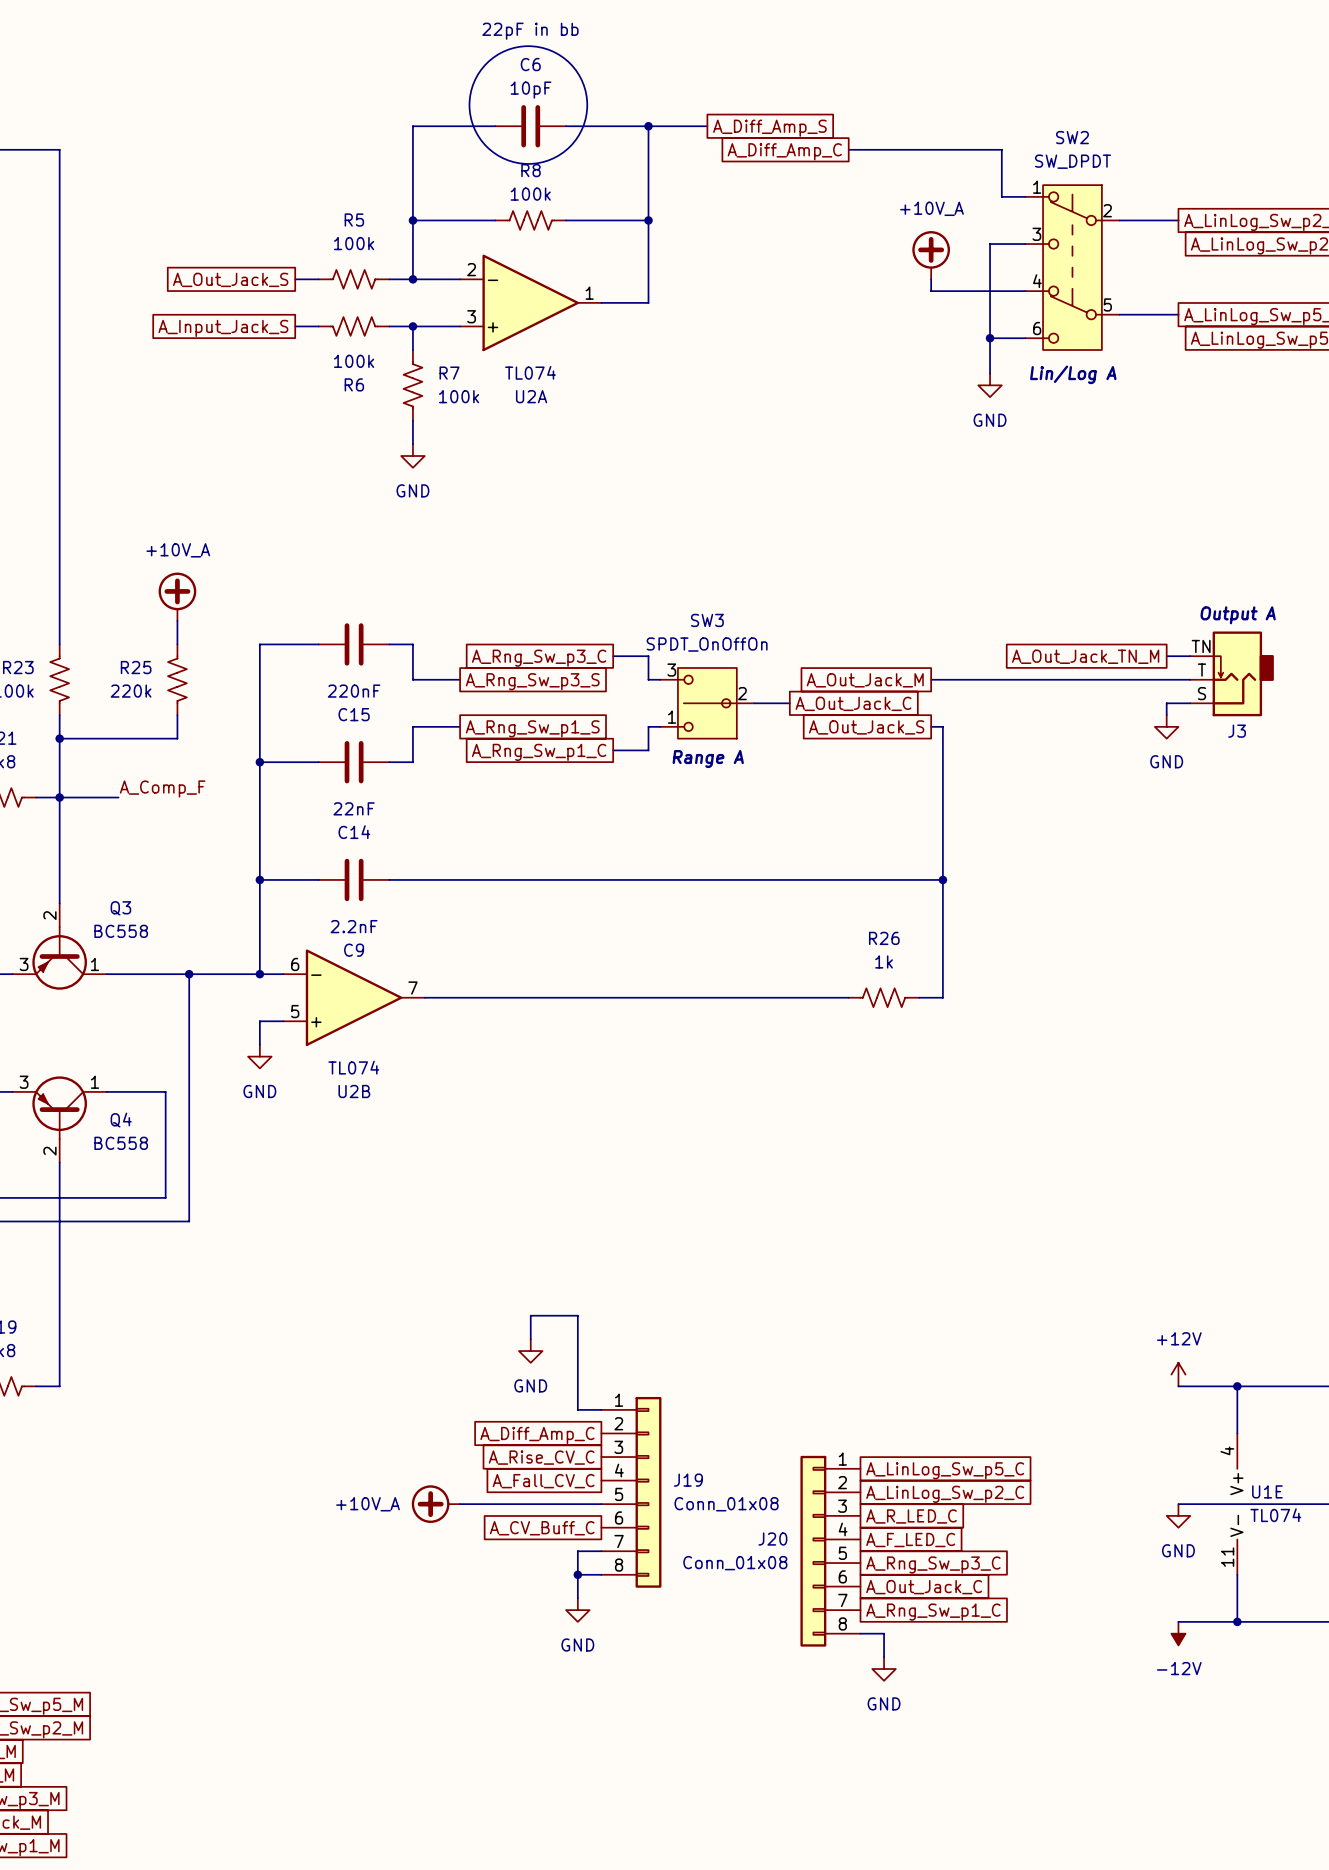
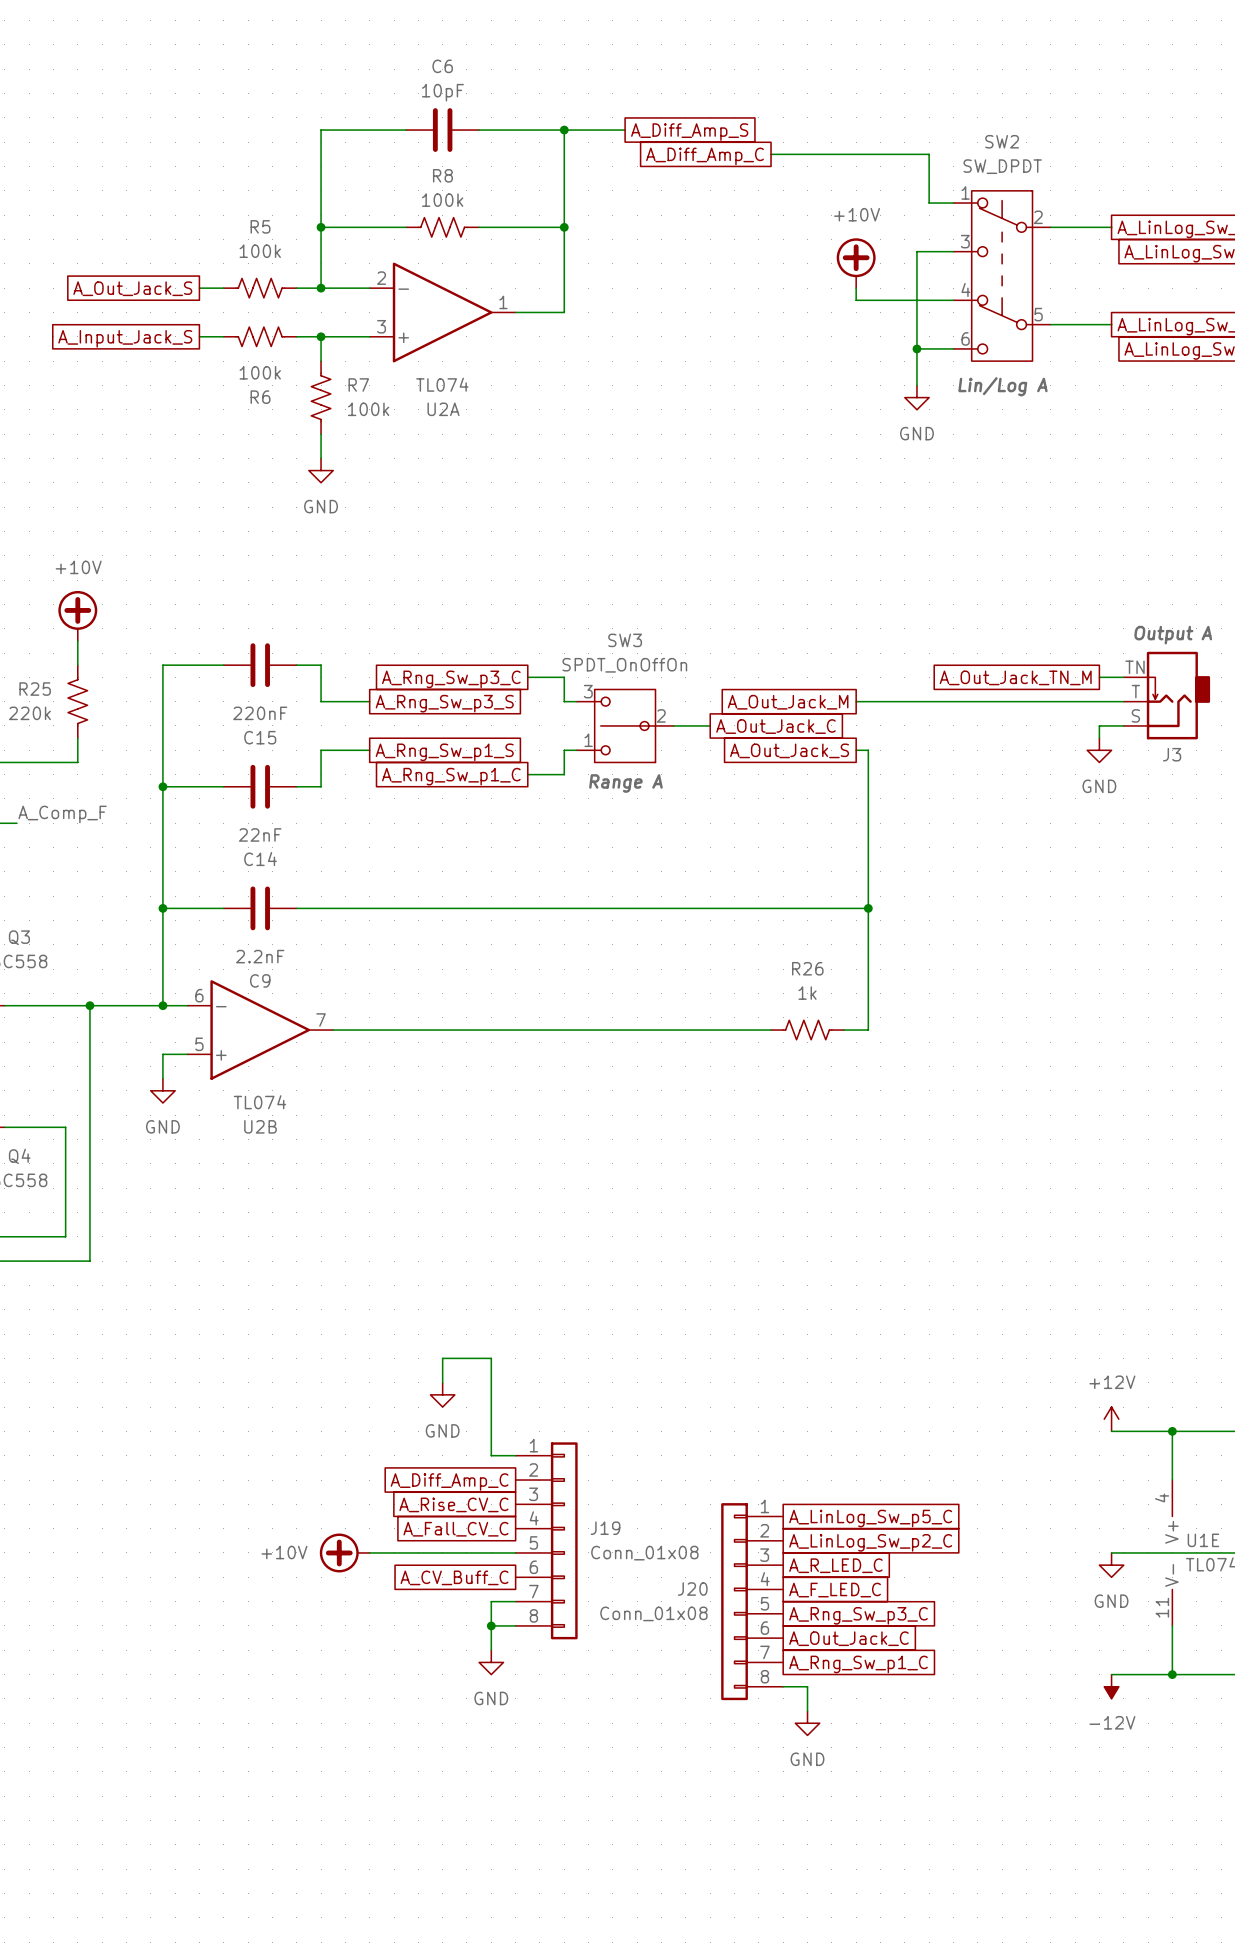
text: 22pF in bb (530, 31) -> none
drawing: [469, 46, 588, 164] -> none
power symbol: +10V_A (931, 255) -> +10V (856, 263)
power symbol: +10V_A (177, 596) -> +10V (77, 615)
power symbol: +10V_A (435, 1504) -> +10V (344, 1552)

